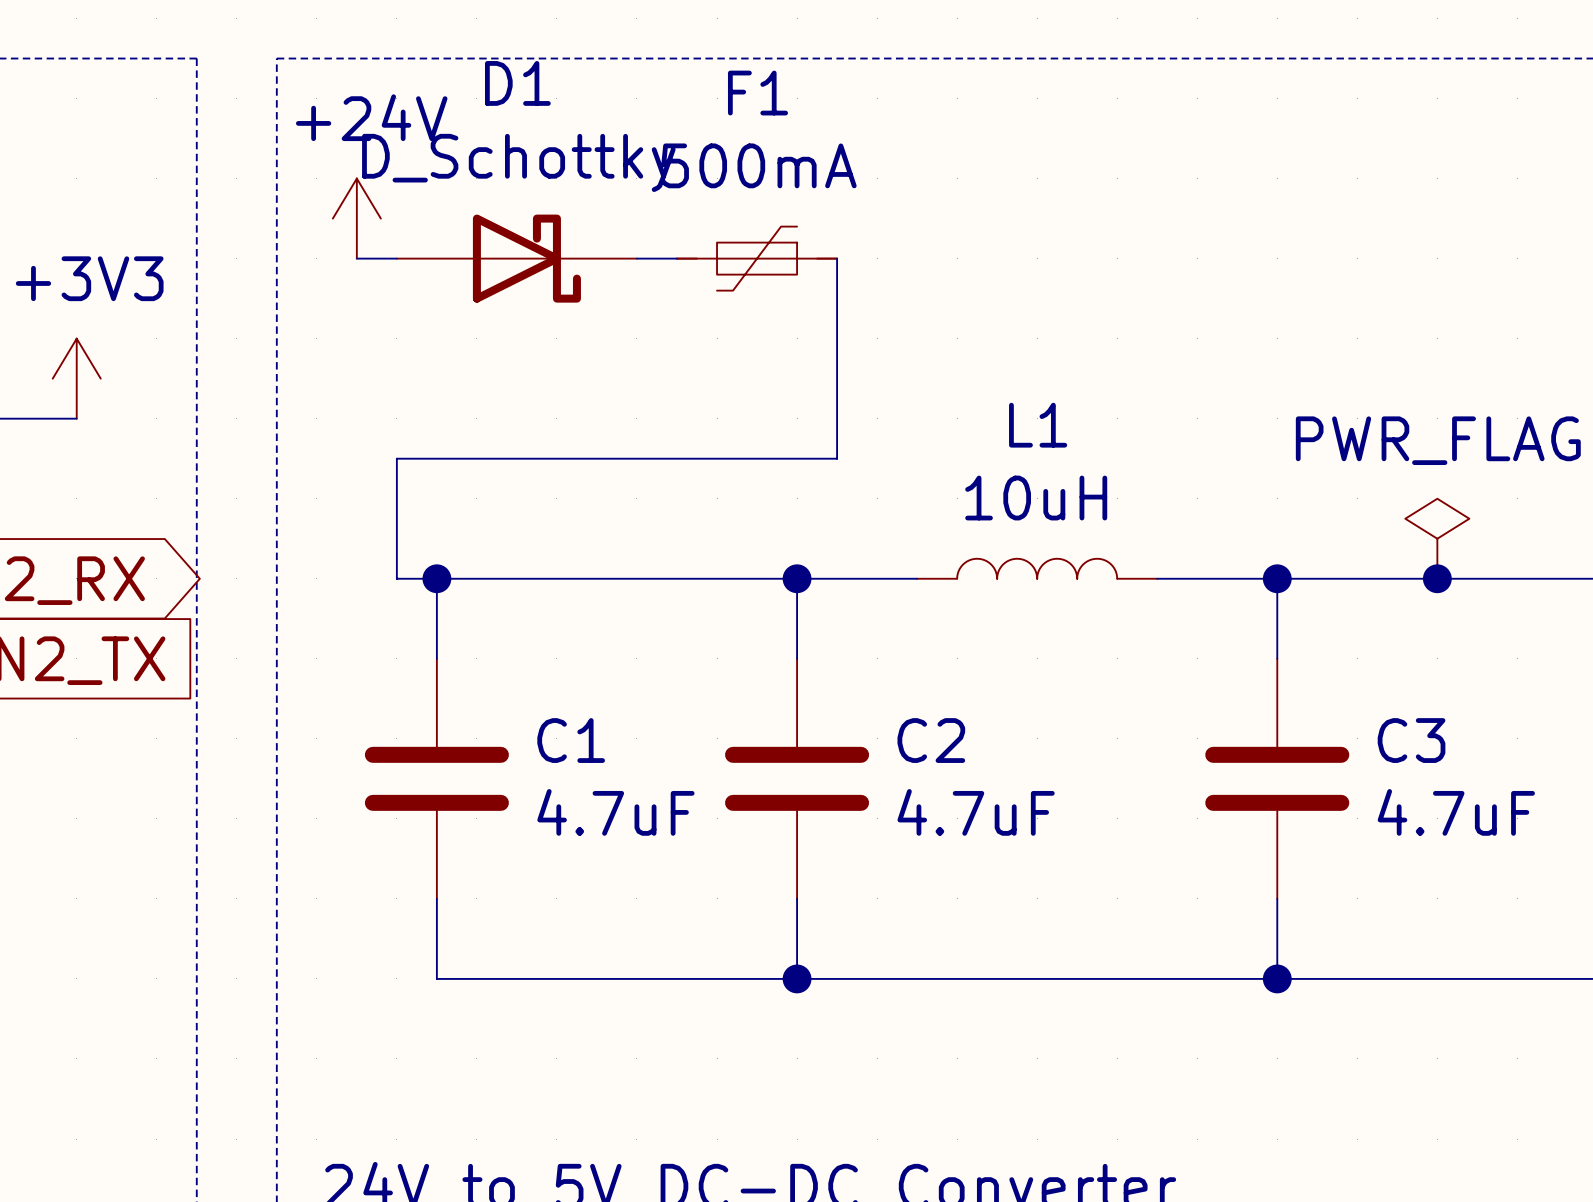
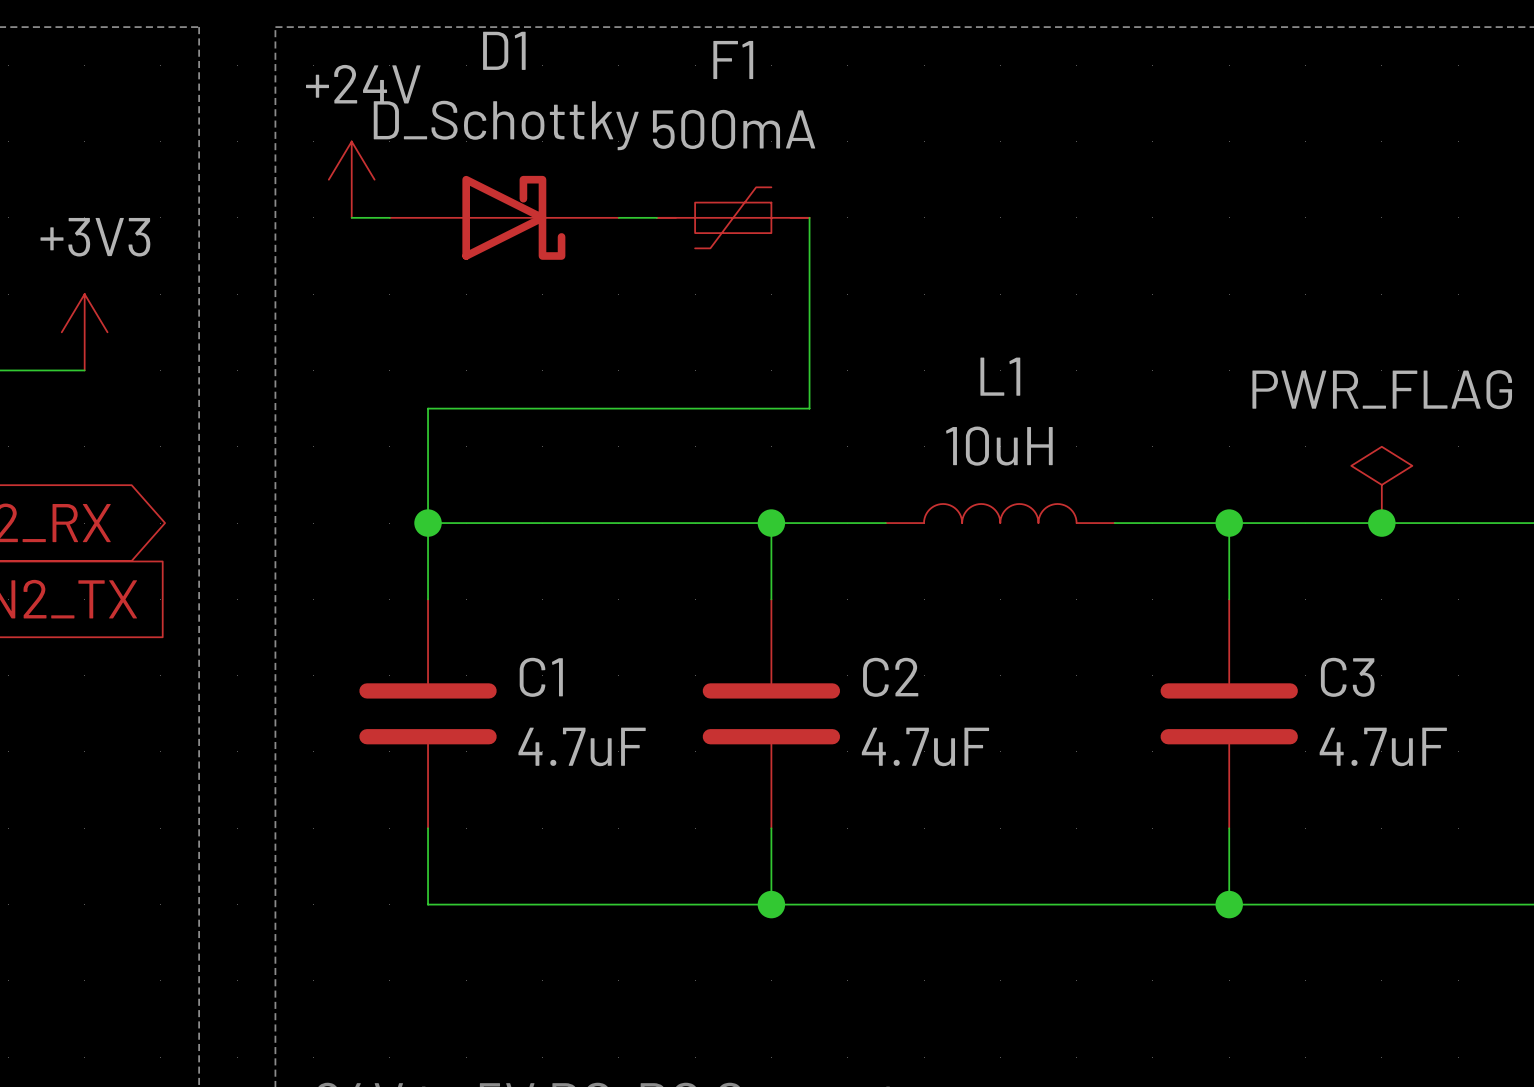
wire: (436, 458) (396, 458) (396, 578) (436, 578) -> (428, 408) (428, 523)

